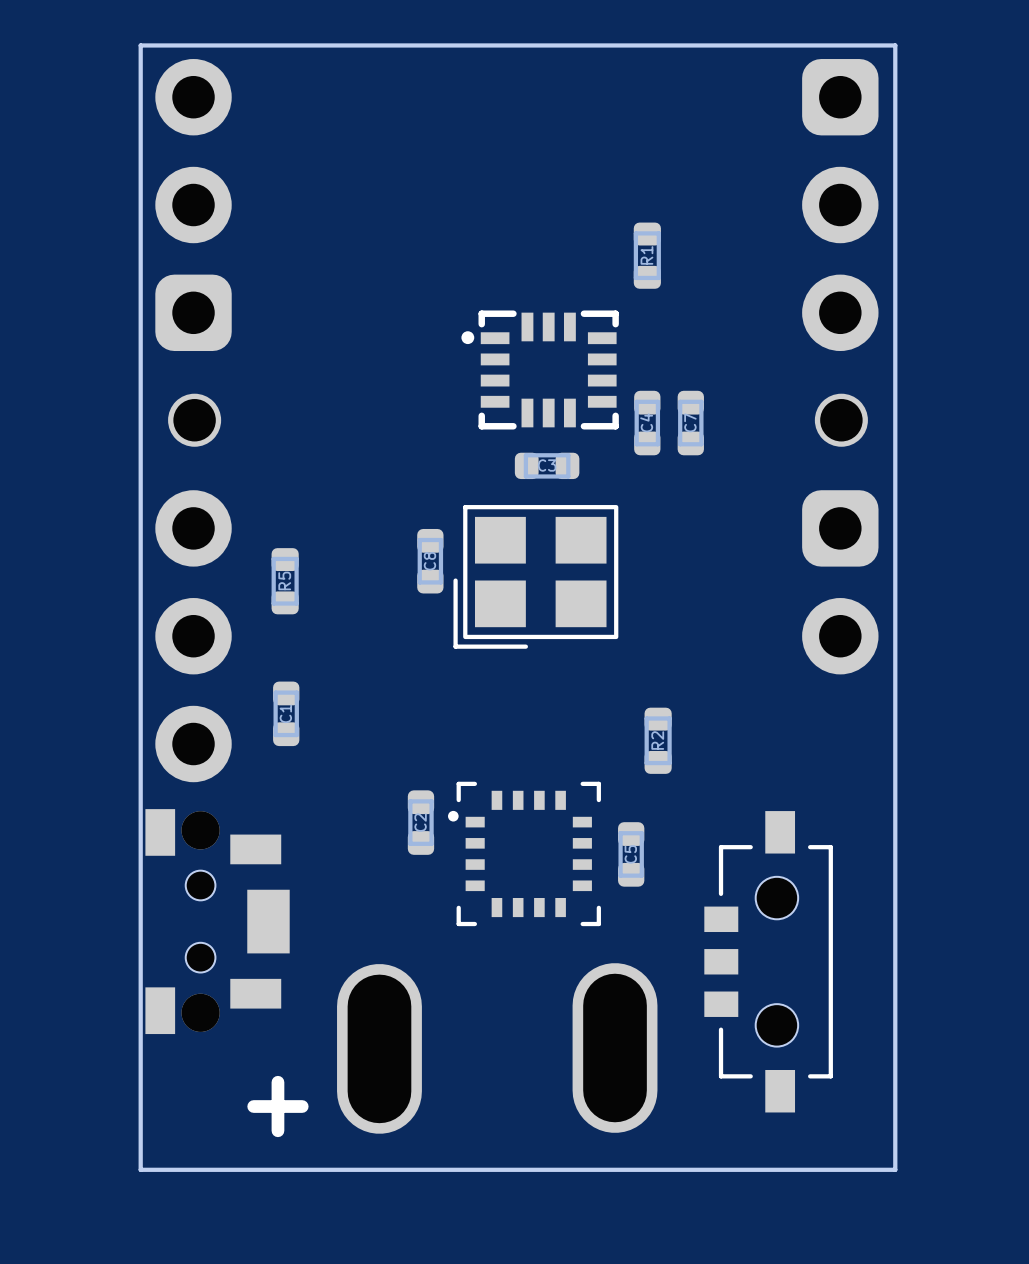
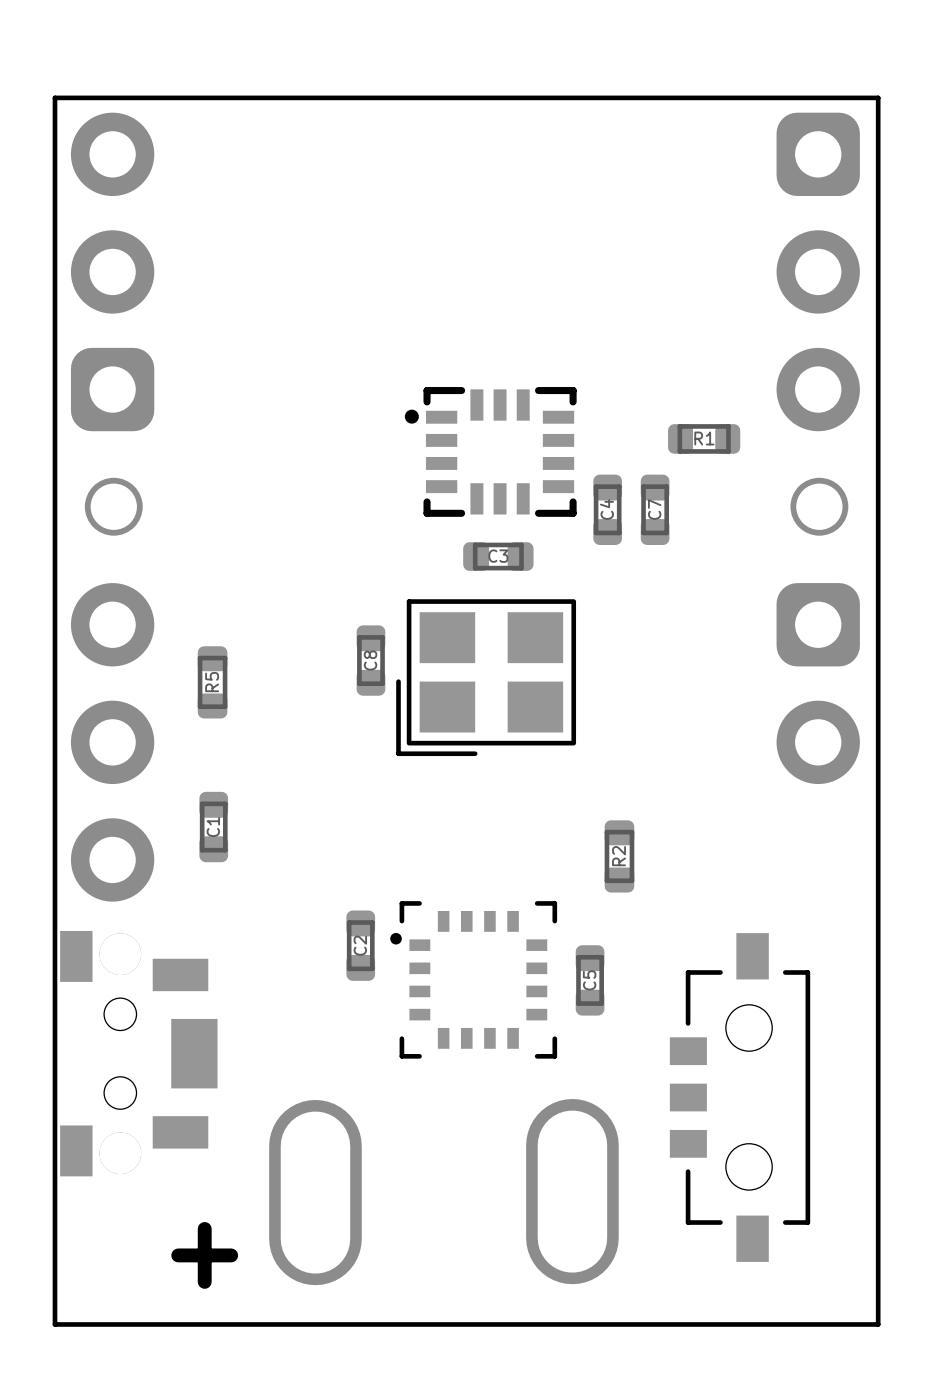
R1 rotation: 0° (647, 255) -> 90° clockwise (704, 438)
R1 position: (647, 255) -> (704, 438)

